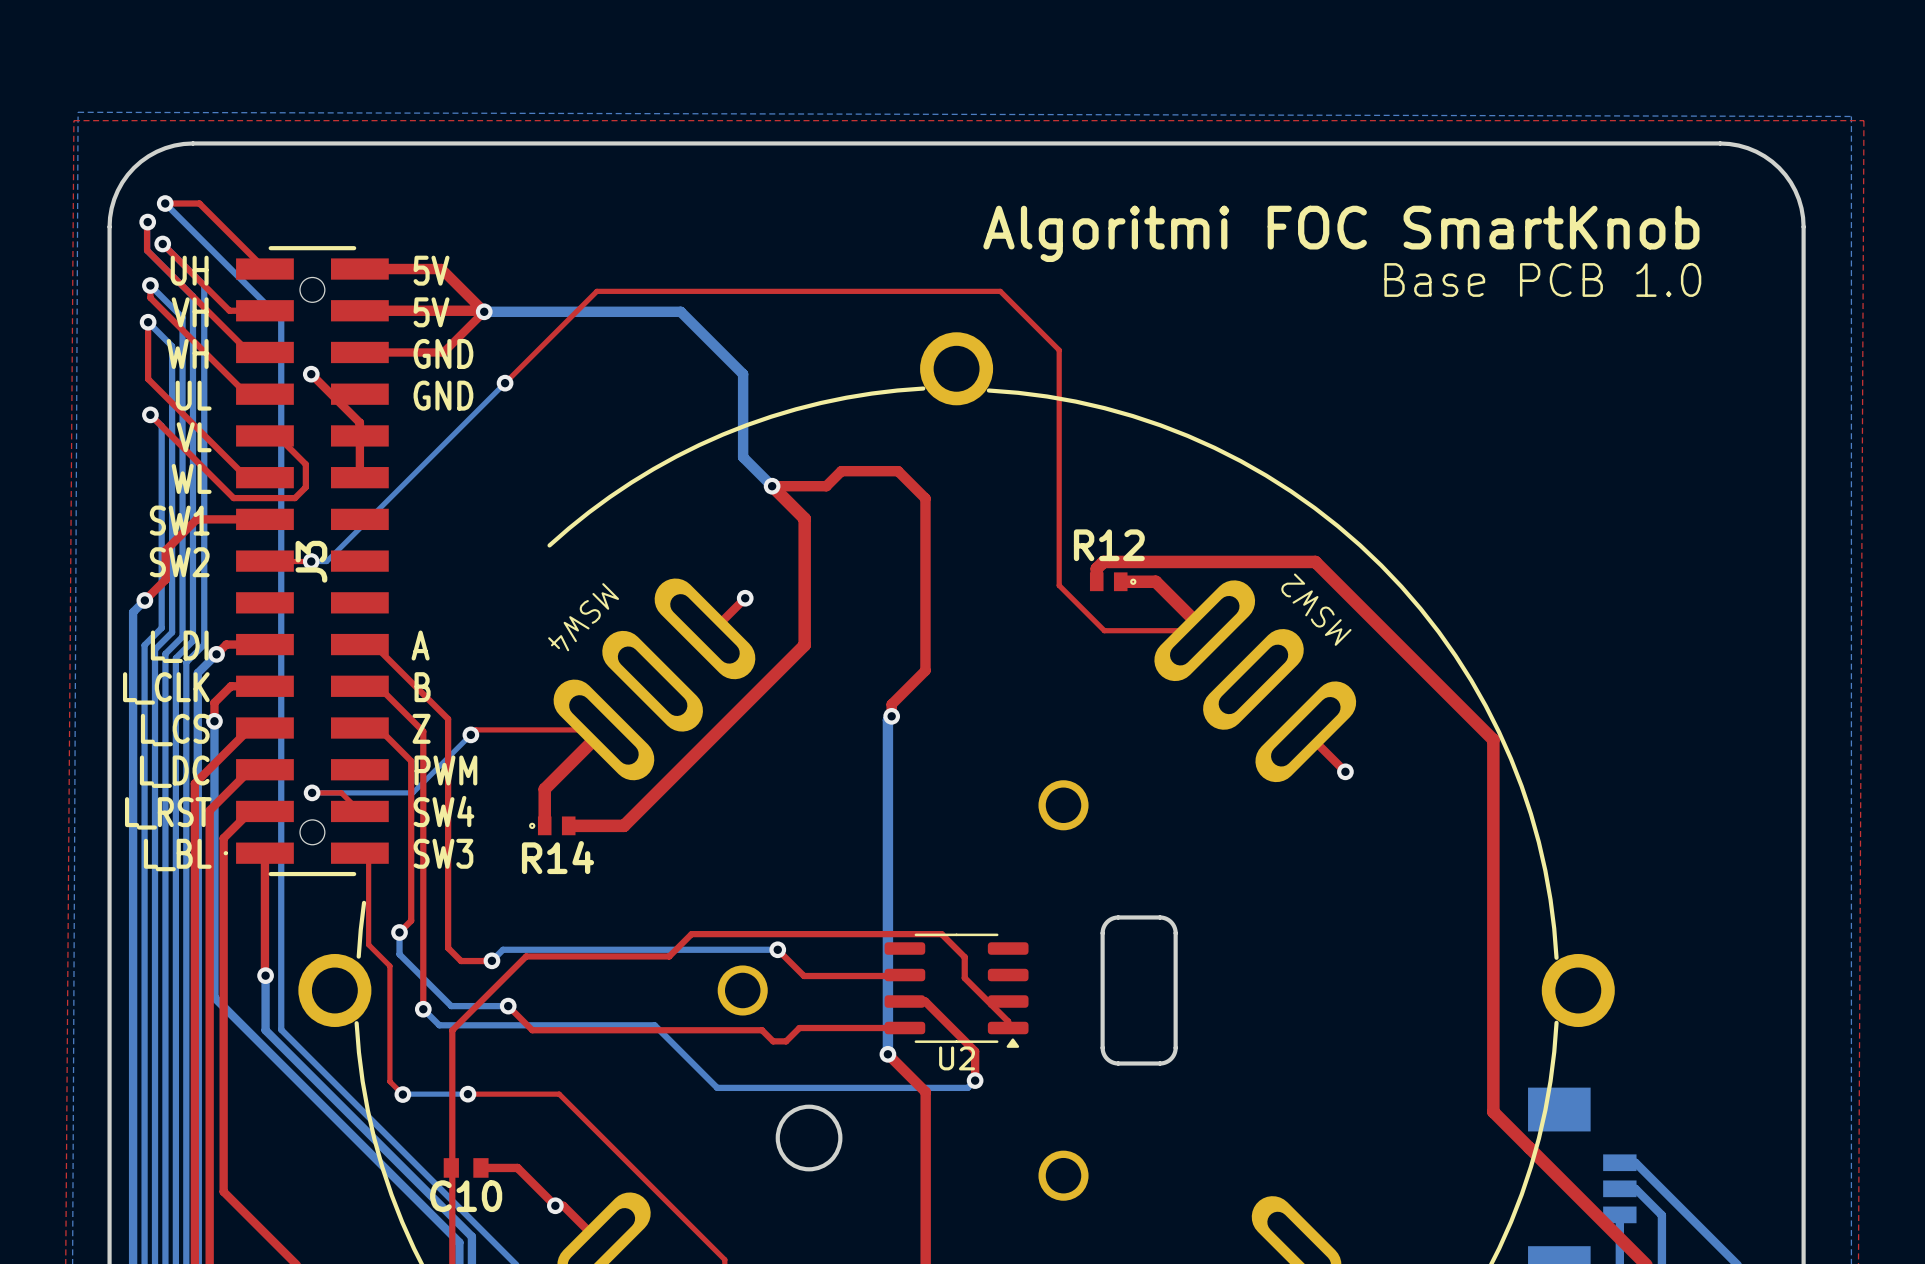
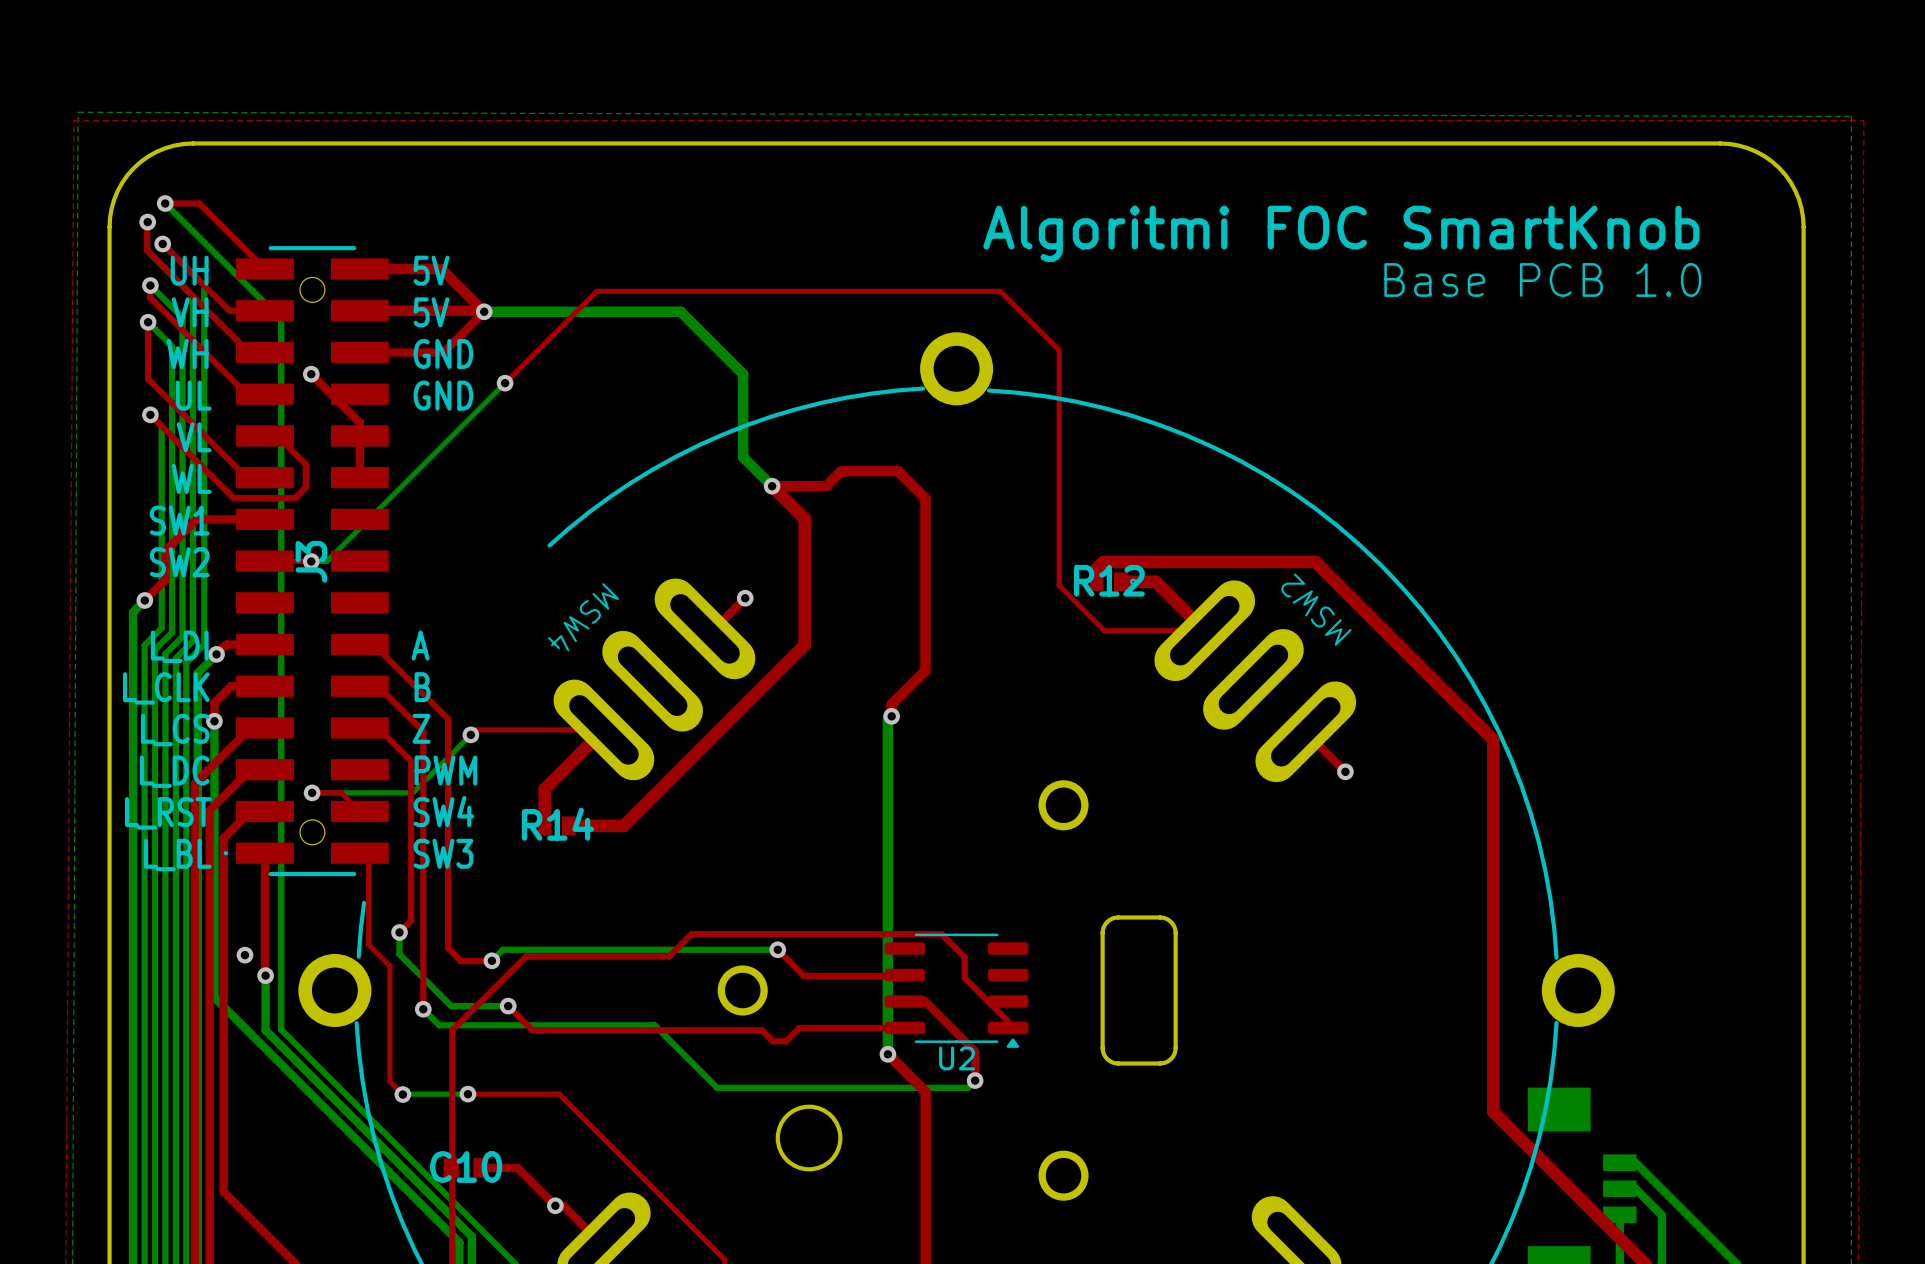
R12 name position: R12 (1109, 545) -> R12 (1109, 580)
R14 name position: R14 (557, 857) -> R14 (557, 824)
via: none -> (244, 955)
C10 name position: C10 (466, 1196) -> C10 (466, 1166)

